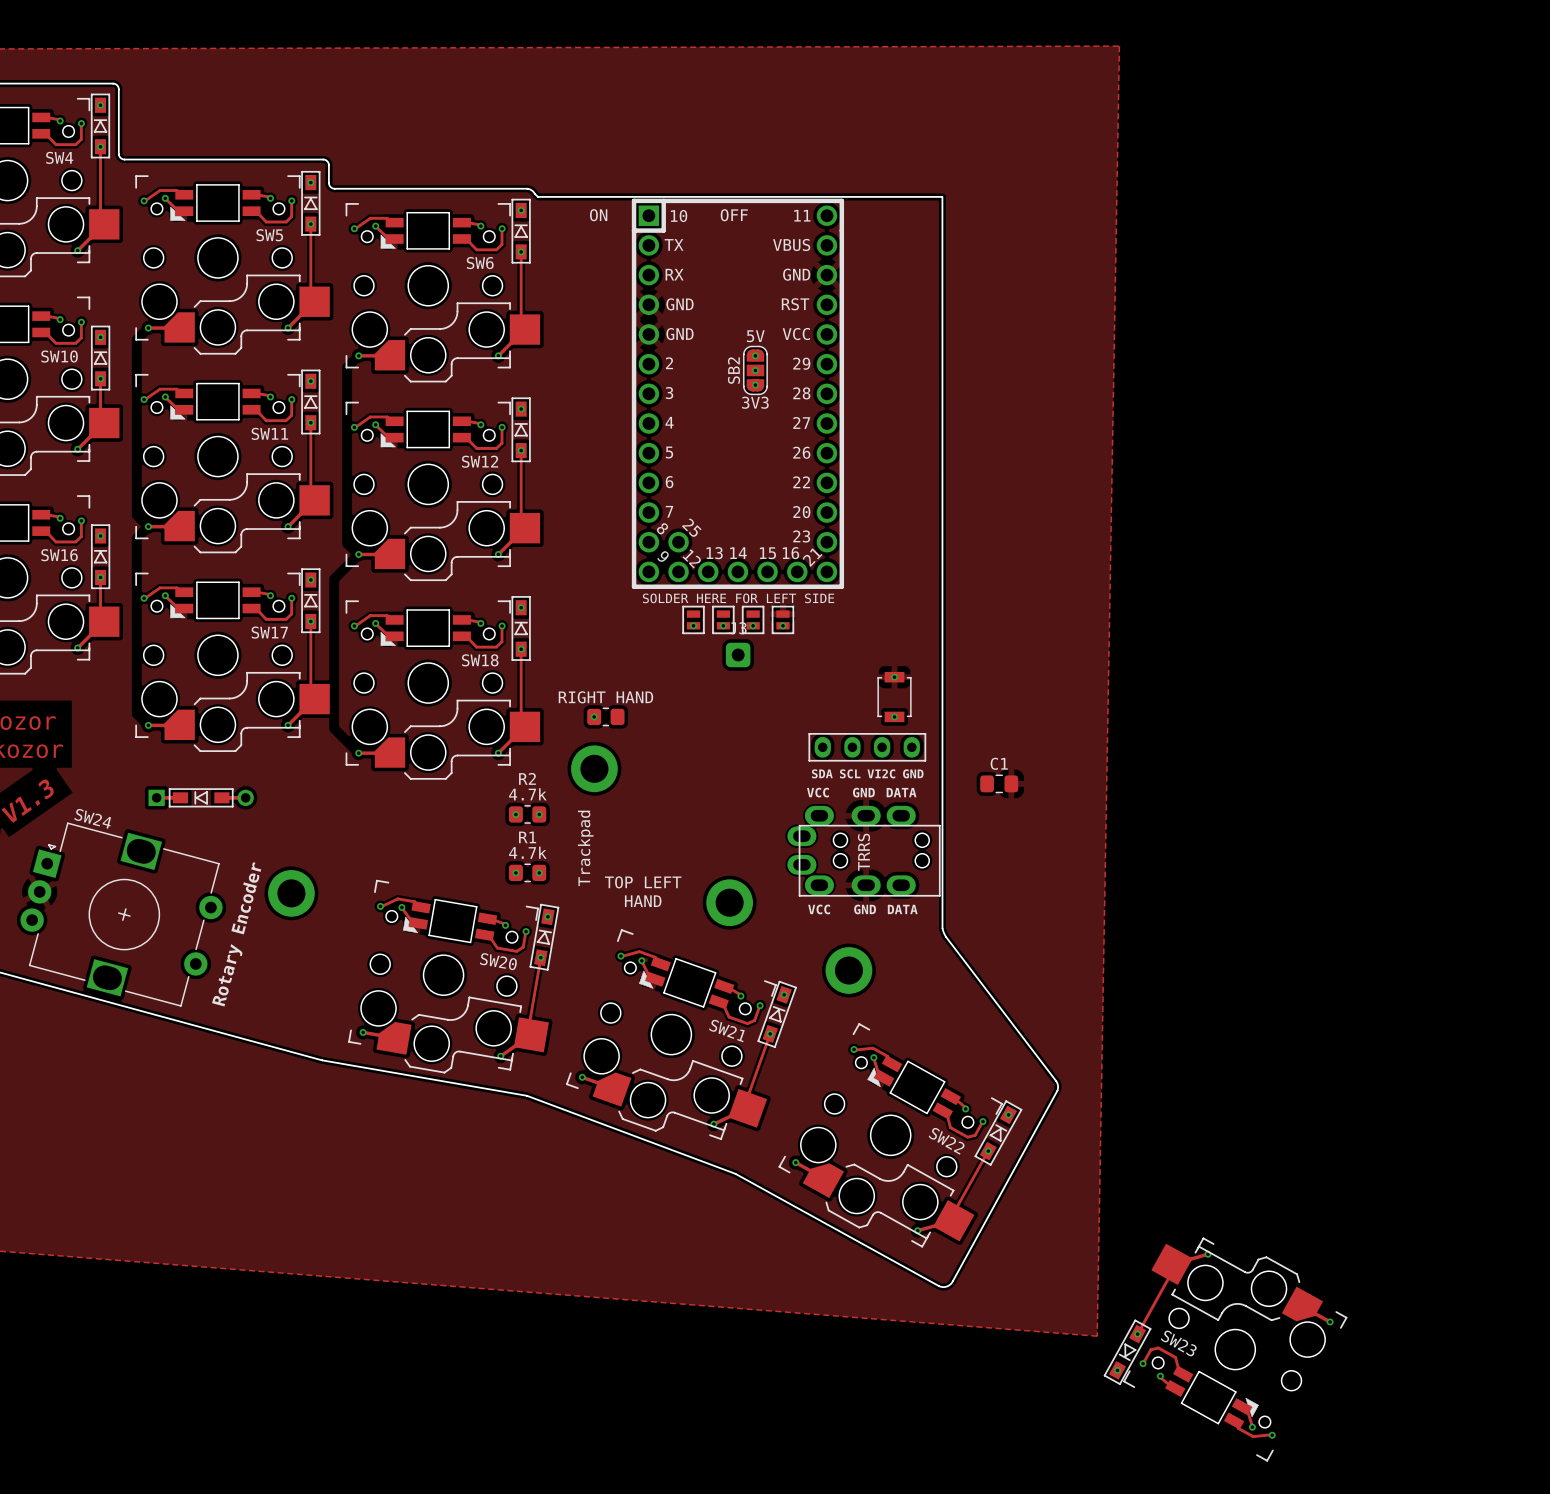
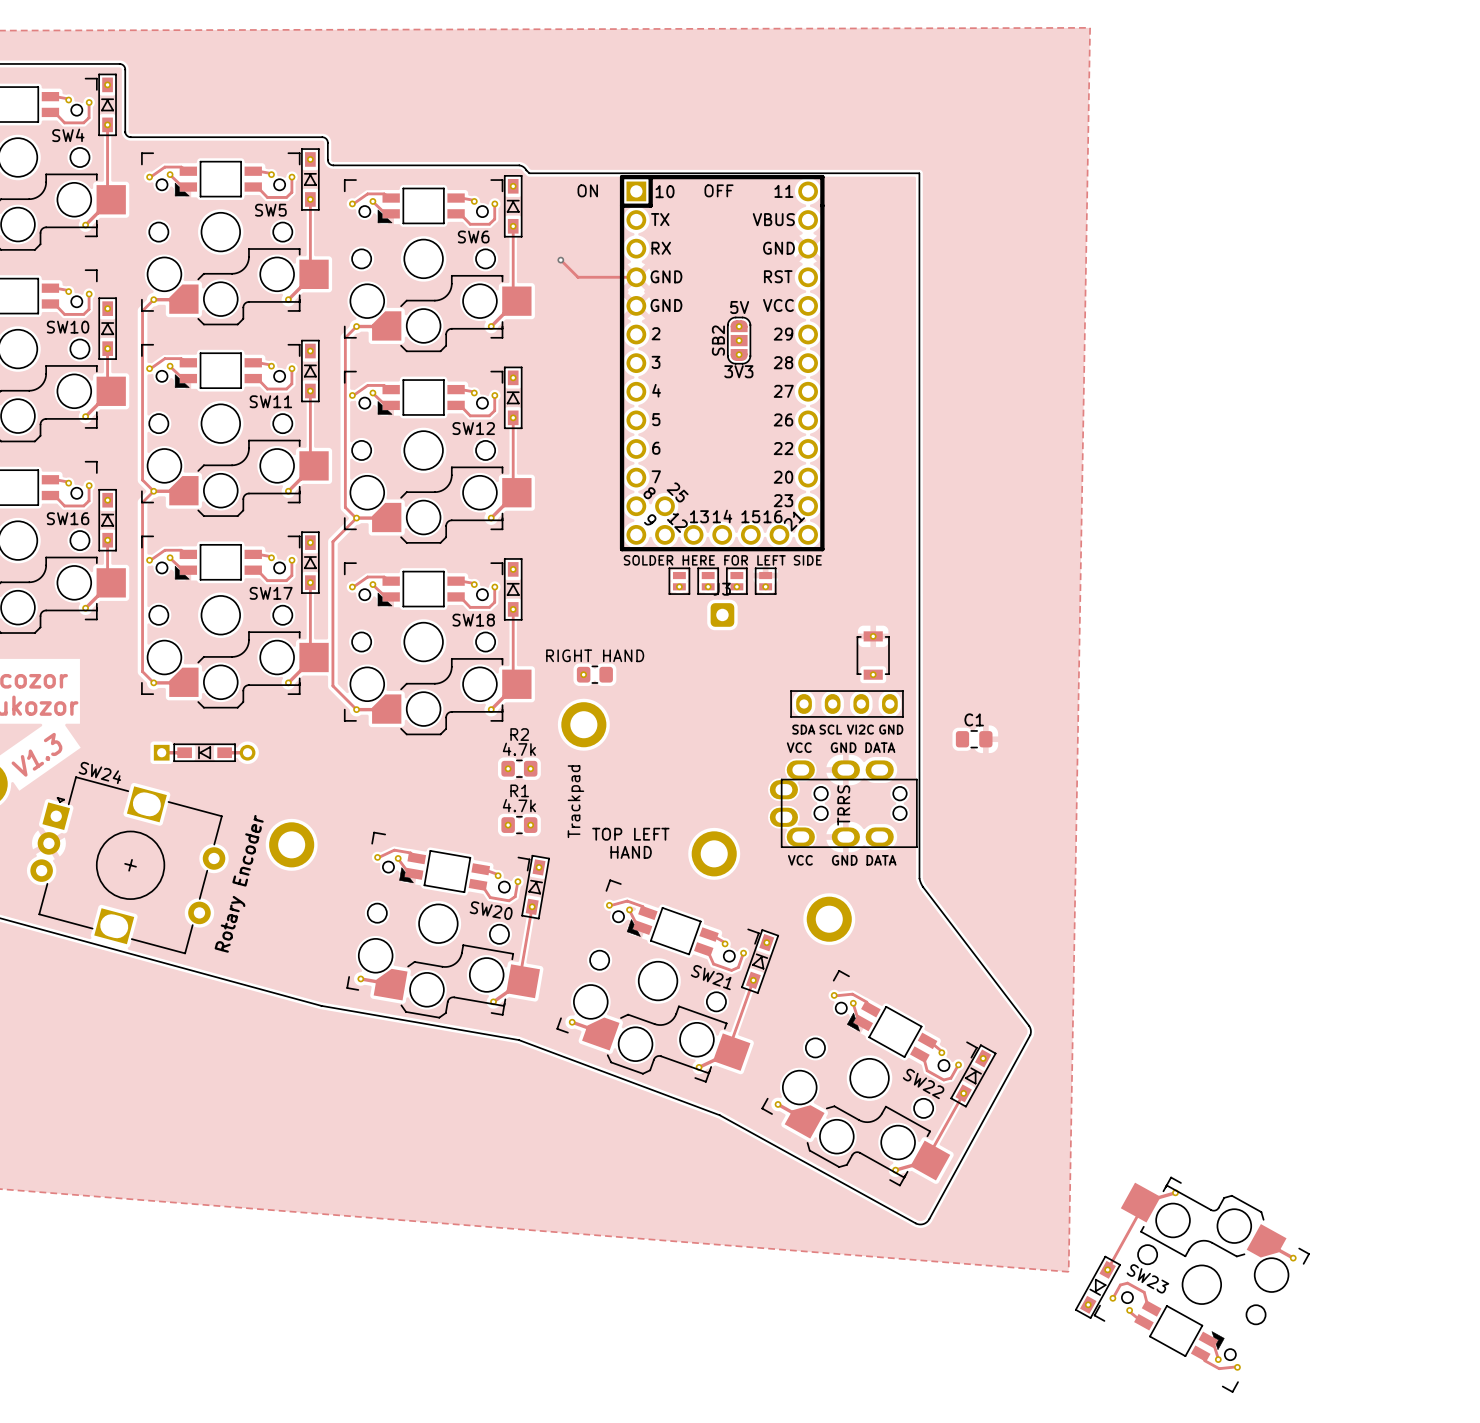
track: none -> (560, 260) (577, 277) (636, 277)
via: none -> (560, 260)
track: none -> (153, 299) (142, 310) (142, 480) (153, 491) (142, 502) (142, 671) (153, 682)
track: none -> (356, 326) (345, 337) (345, 507) (356, 518)
track: none -> (356, 518) (332, 541) (332, 685) (356, 709) (366, 709)

